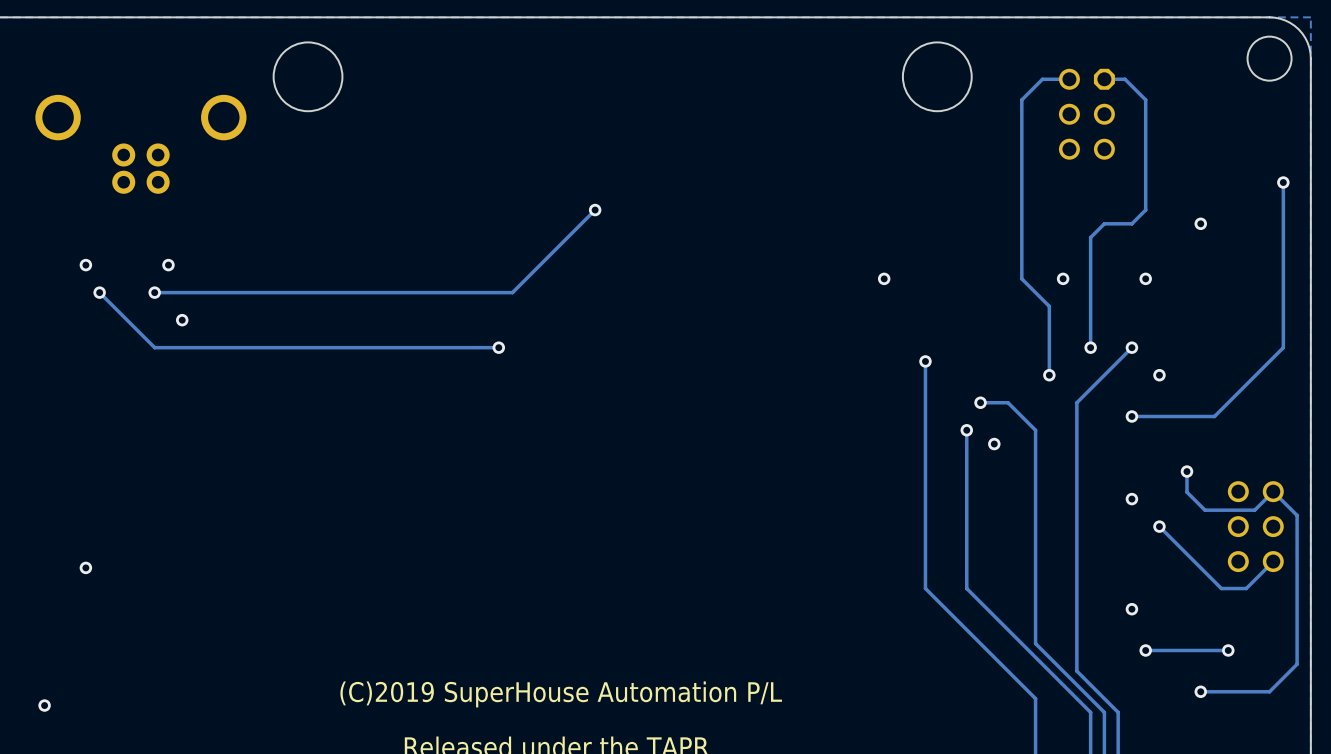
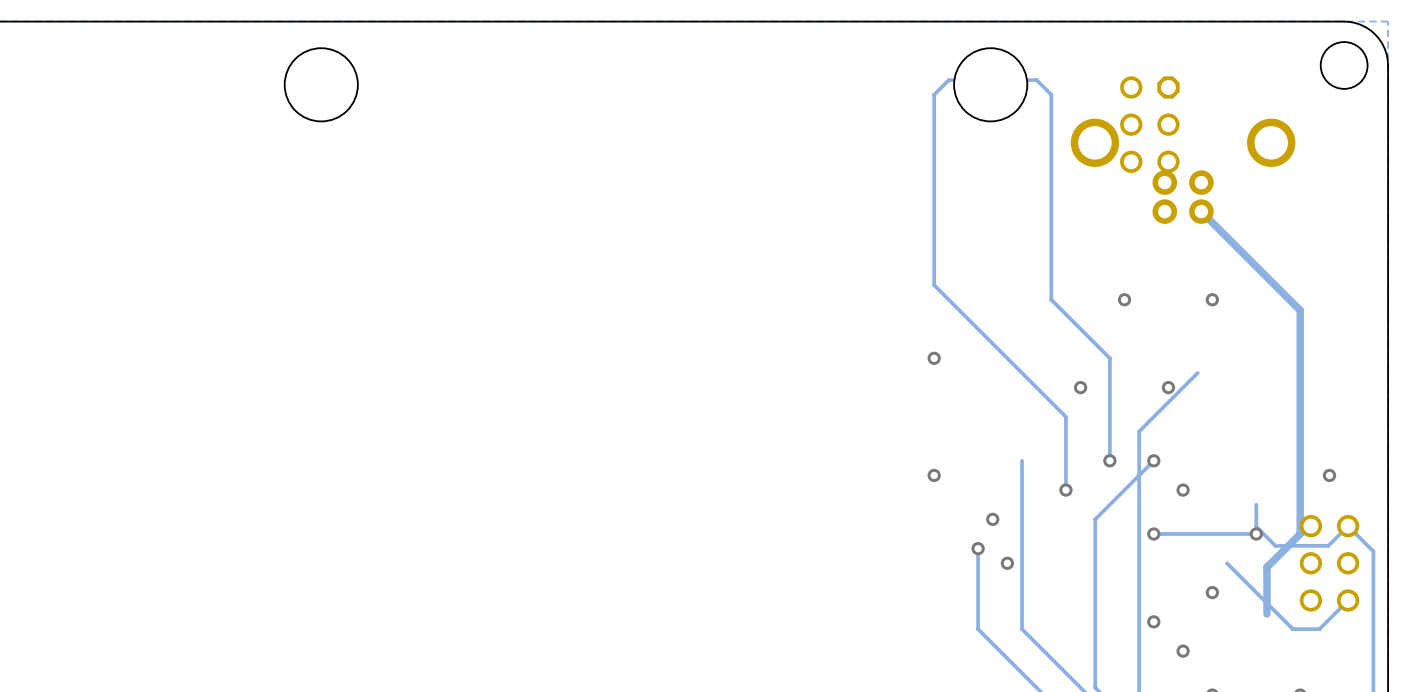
track: none -> (984, 80) (948, 80) (934, 94) (934, 285) (1065, 416) (1065, 490)
track: (1069, 79) (1042, 79) (1021, 99) (1021, 278) (1049, 306) (1049, 333) -> (1022, 80) (1036, 80) (1051, 94) (1051, 299) (1109, 358)
track: (1104, 79) (1125, 79) (1145, 99) (1145, 210) (1131, 223) (1104, 223) (1090, 237) (1090, 347) -> none
part: (140, 144) -> none
part: none -> (1183, 171)
track: (1283, 182) (1283, 347) (1214, 416) (1131, 416) -> none
via: (1283, 182) -> none
track: none -> (1201, 211) (1300, 310) (1300, 534) (1266, 567) (1266, 613)
track: (595, 210) (512, 292) (154, 292) -> none
via: (595, 210) -> none
via: (1200, 223) -> none
via: (85, 265) -> none
via: (168, 265) -> none
via: (884, 278) -> none
track: (99, 292) (154, 347) (498, 347) -> none
via: (99, 292) -> none
via: (154, 292) -> none
via: (182, 320) -> none
via: none -> (934, 358)
via: (498, 347) -> none
via: (1090, 347) -> none
via: (1131, 347) -> none
track: (925, 361) (925, 512) -> none
via: (925, 361) -> none
via: none -> (1080, 387)
via: none -> (1168, 387)
track: none -> (1109, 402) (1109, 460)
via: (1049, 375) -> none
via: (1159, 375) -> none
track: (980, 402) (1008, 402) (1035, 430) (1035, 485) -> (1153, 460) (1095, 519)
via: (980, 402) -> none
via: (1131, 416) -> none
via: (966, 430) -> none
via: none -> (1109, 460)
via: none -> (1153, 460)
via: none -> (934, 475)
via position: (994, 444) -> (1065, 490)
via: none -> (1329, 475)
via: none -> (1183, 490)
via: (1186, 471) -> none
via: none -> (992, 519)
via: none -> (1153, 534)
via: (1131, 499) -> none
track: none -> (1256, 534) (1153, 534)
via: none -> (1256, 534)
via: none -> (978, 548)
via: none -> (1007, 563)
via: (1159, 526) -> none
via: none -> (1212, 592)
via: (85, 567) -> none
via: none -> (1153, 621)
via position: (1131, 609) -> (1183, 651)

